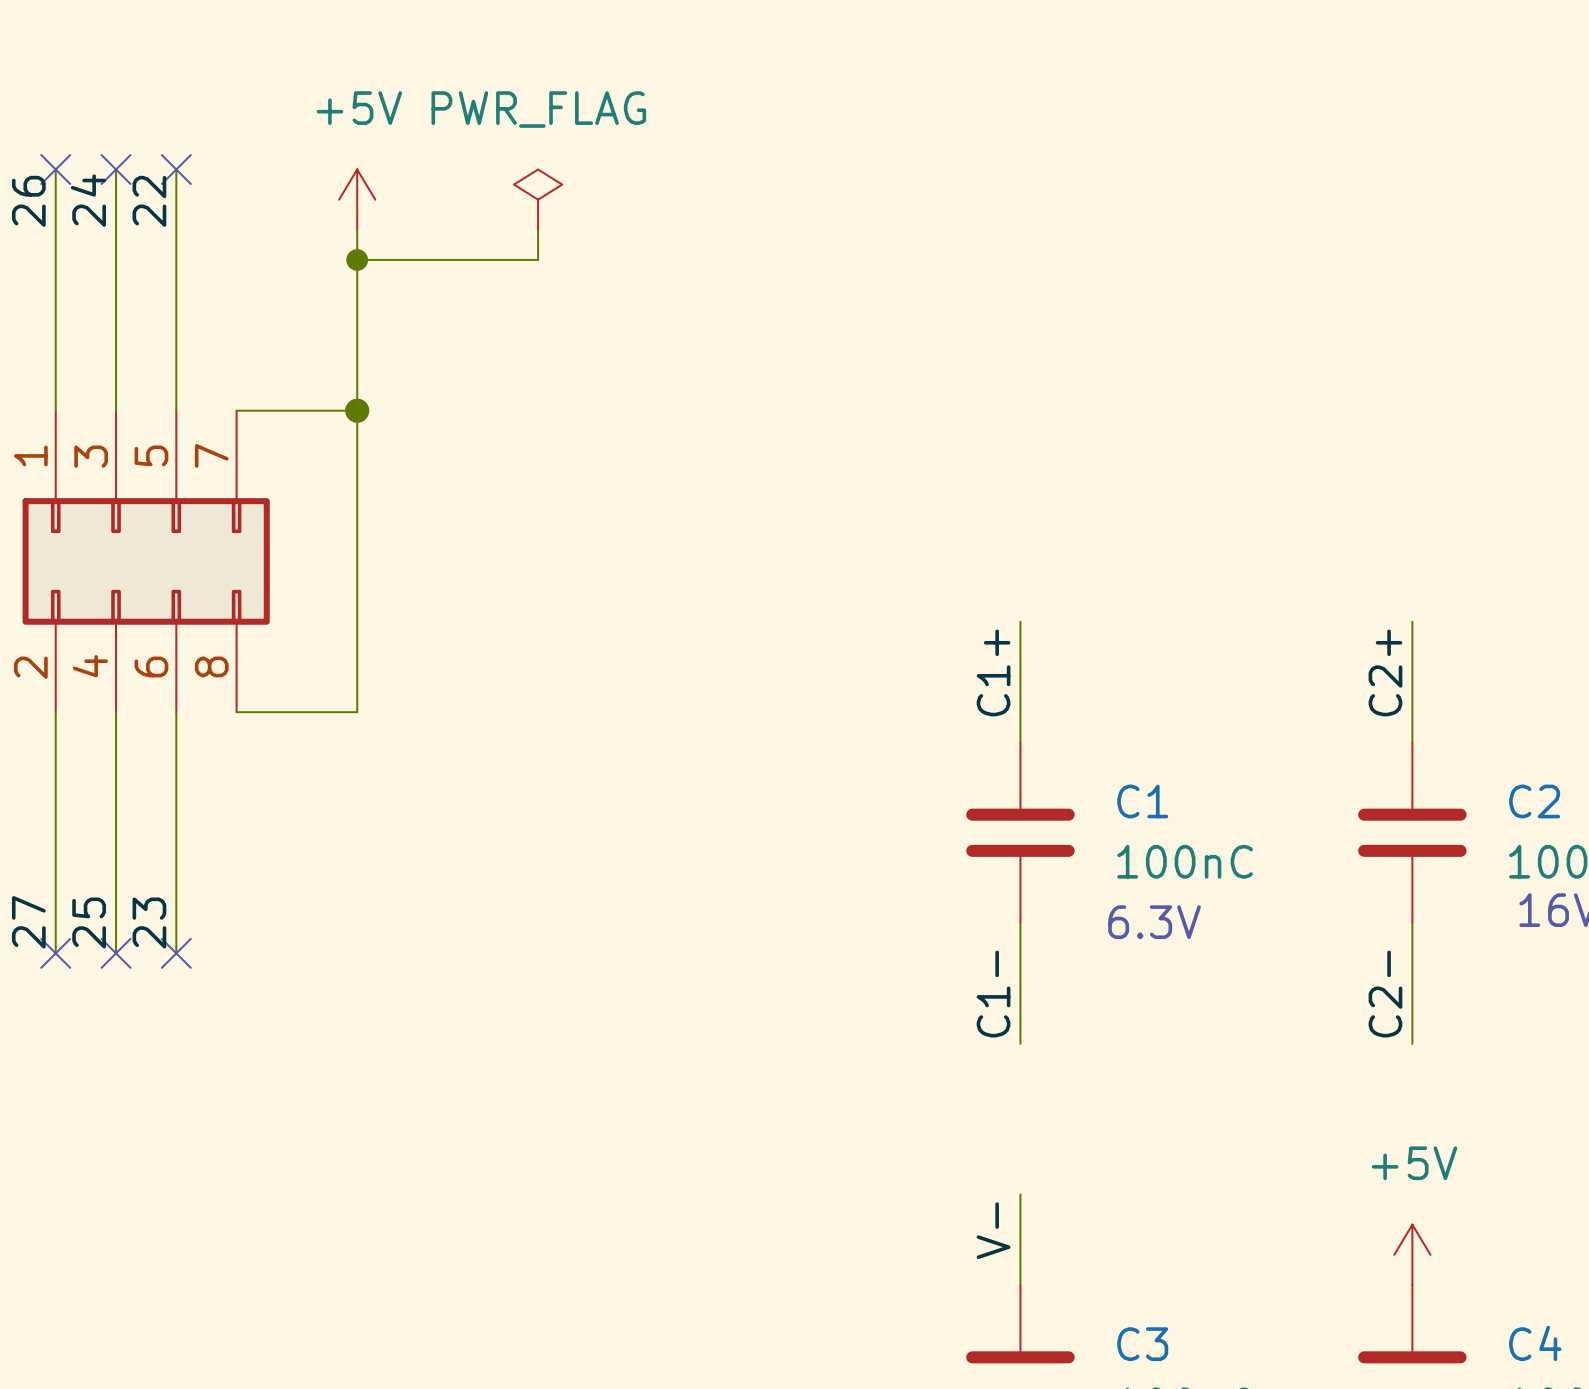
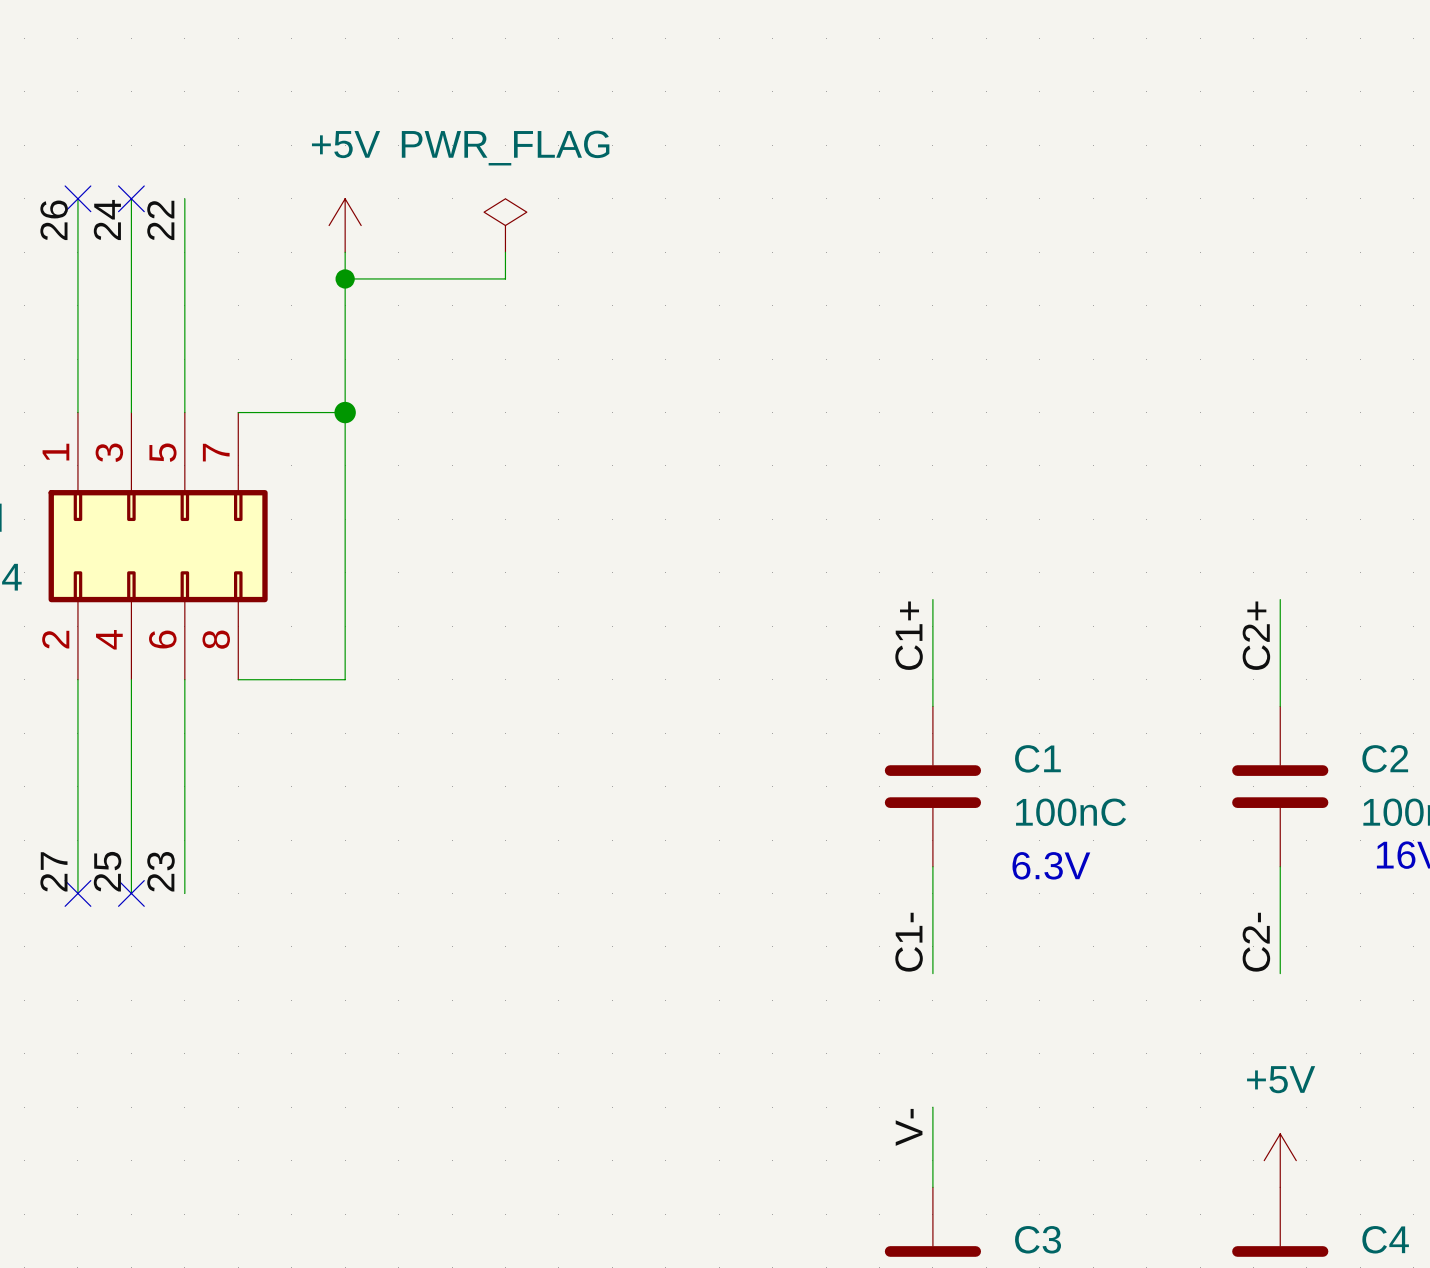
no-connect mark: (176, 169) -> none
no-connect mark: (176, 953) -> none

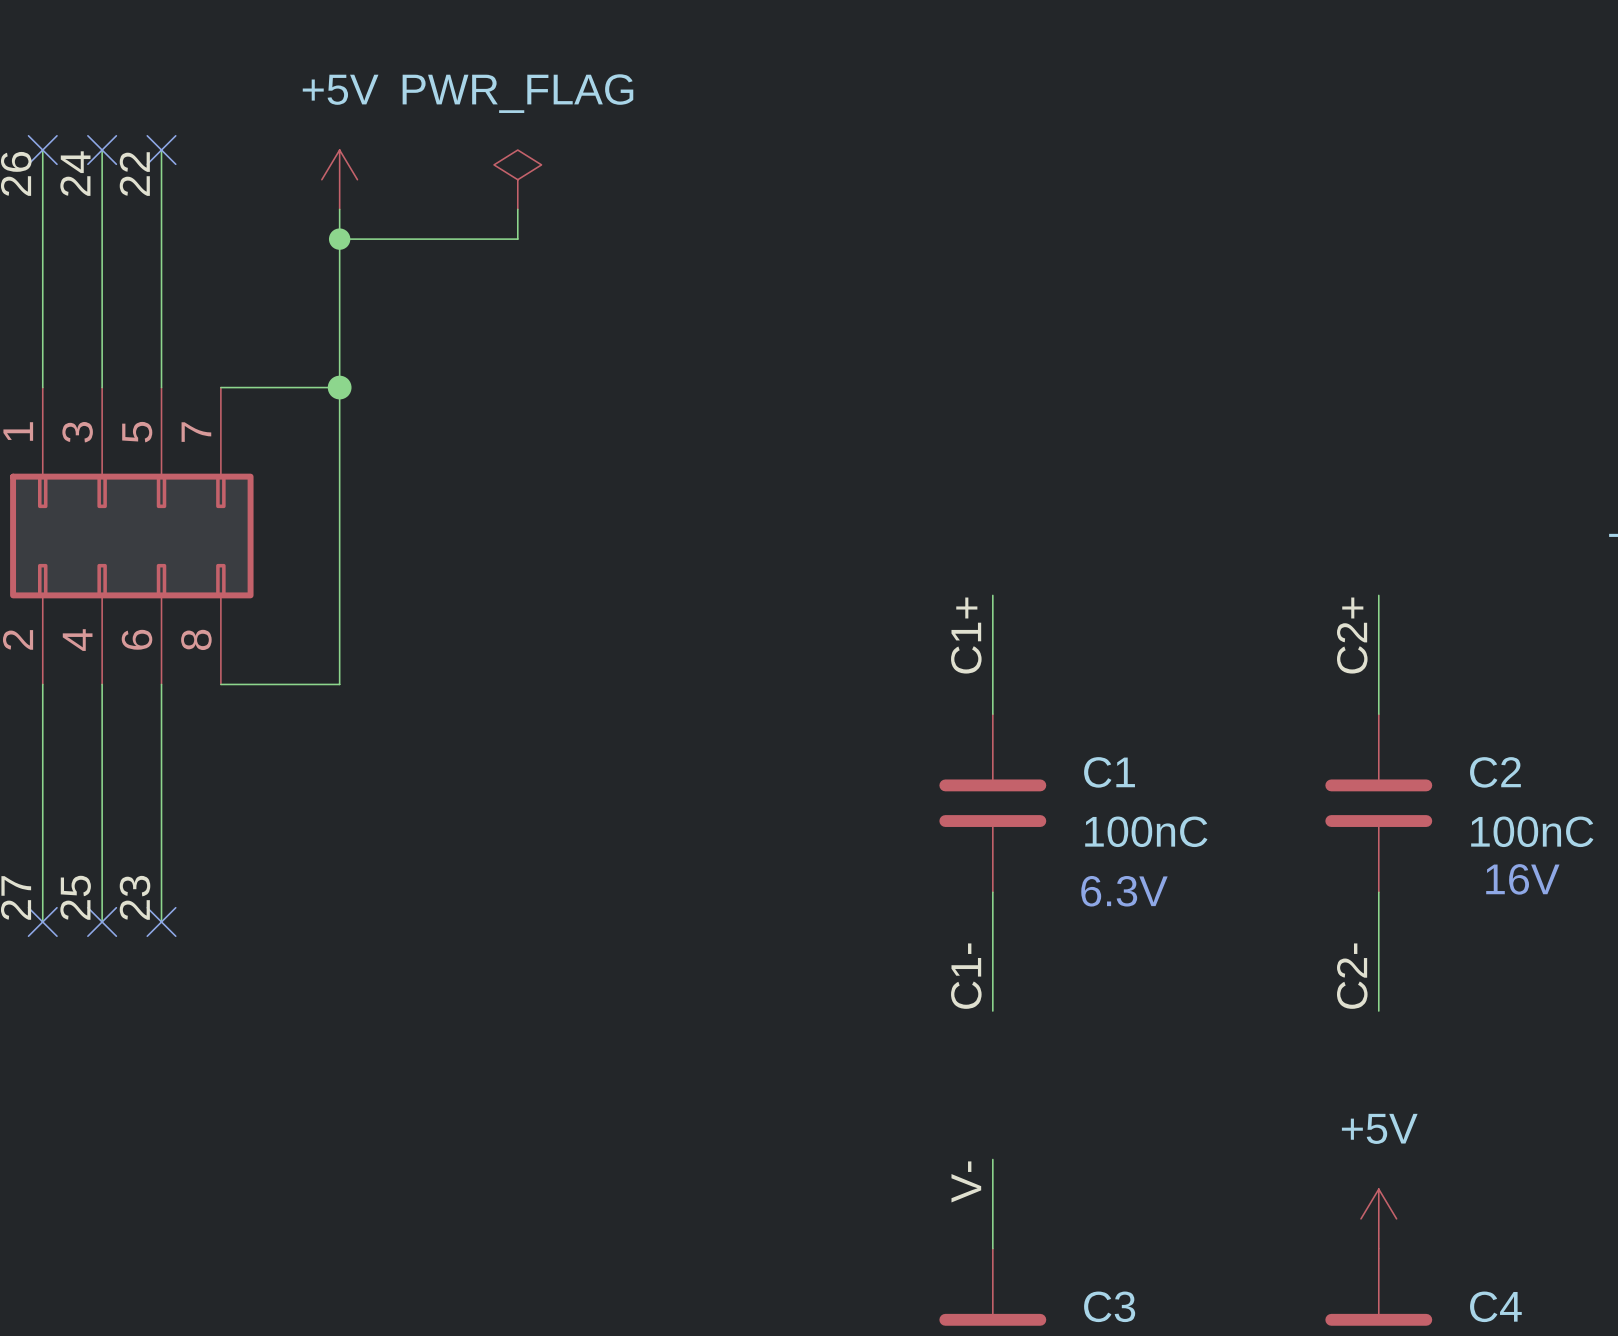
no-connect mark: none -> (161, 150)
no-connect mark: none -> (161, 921)

